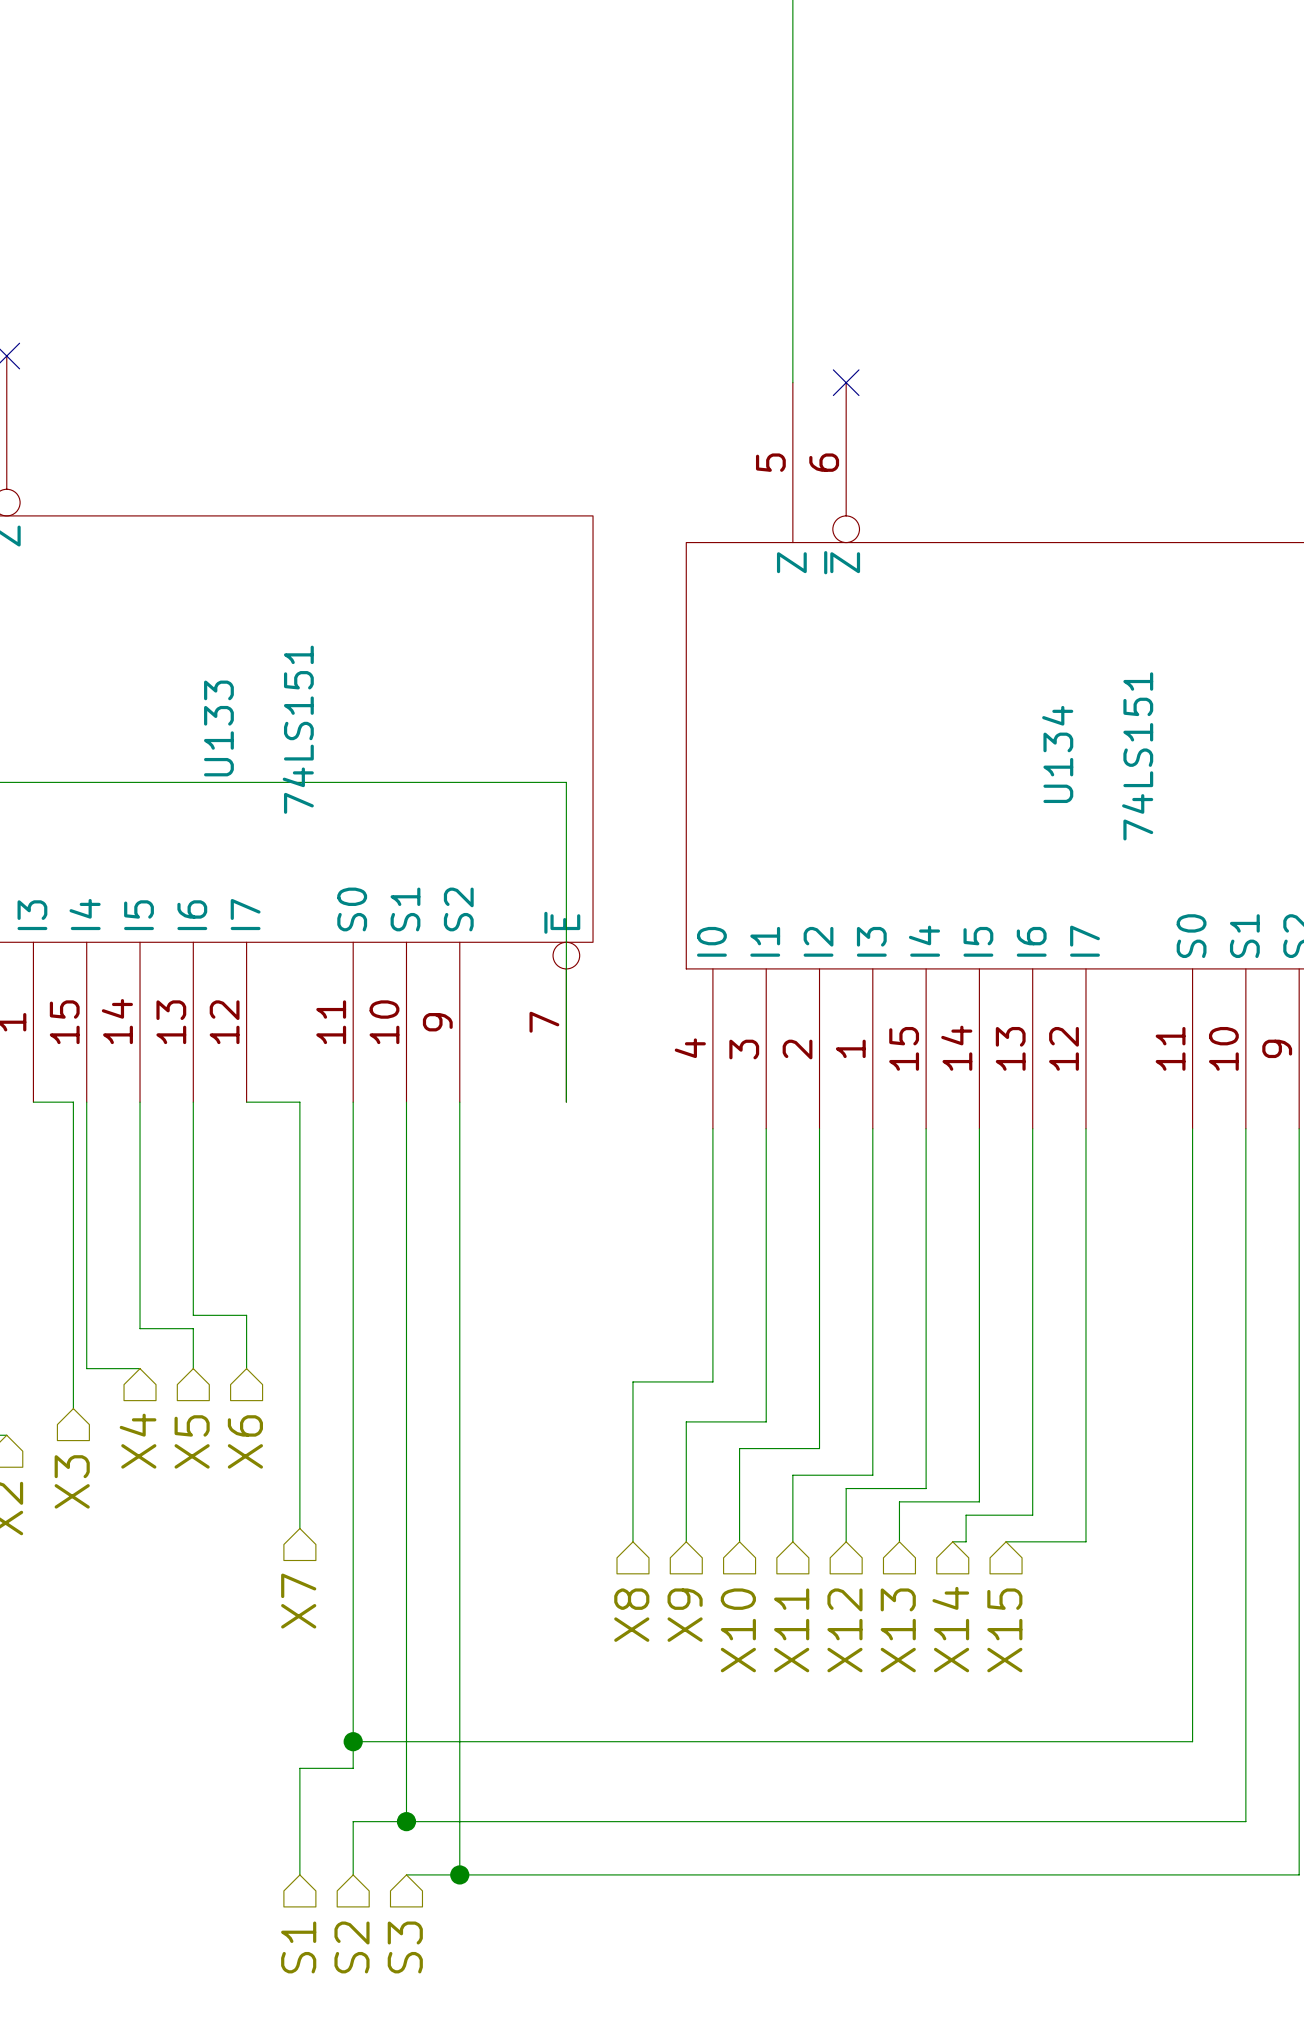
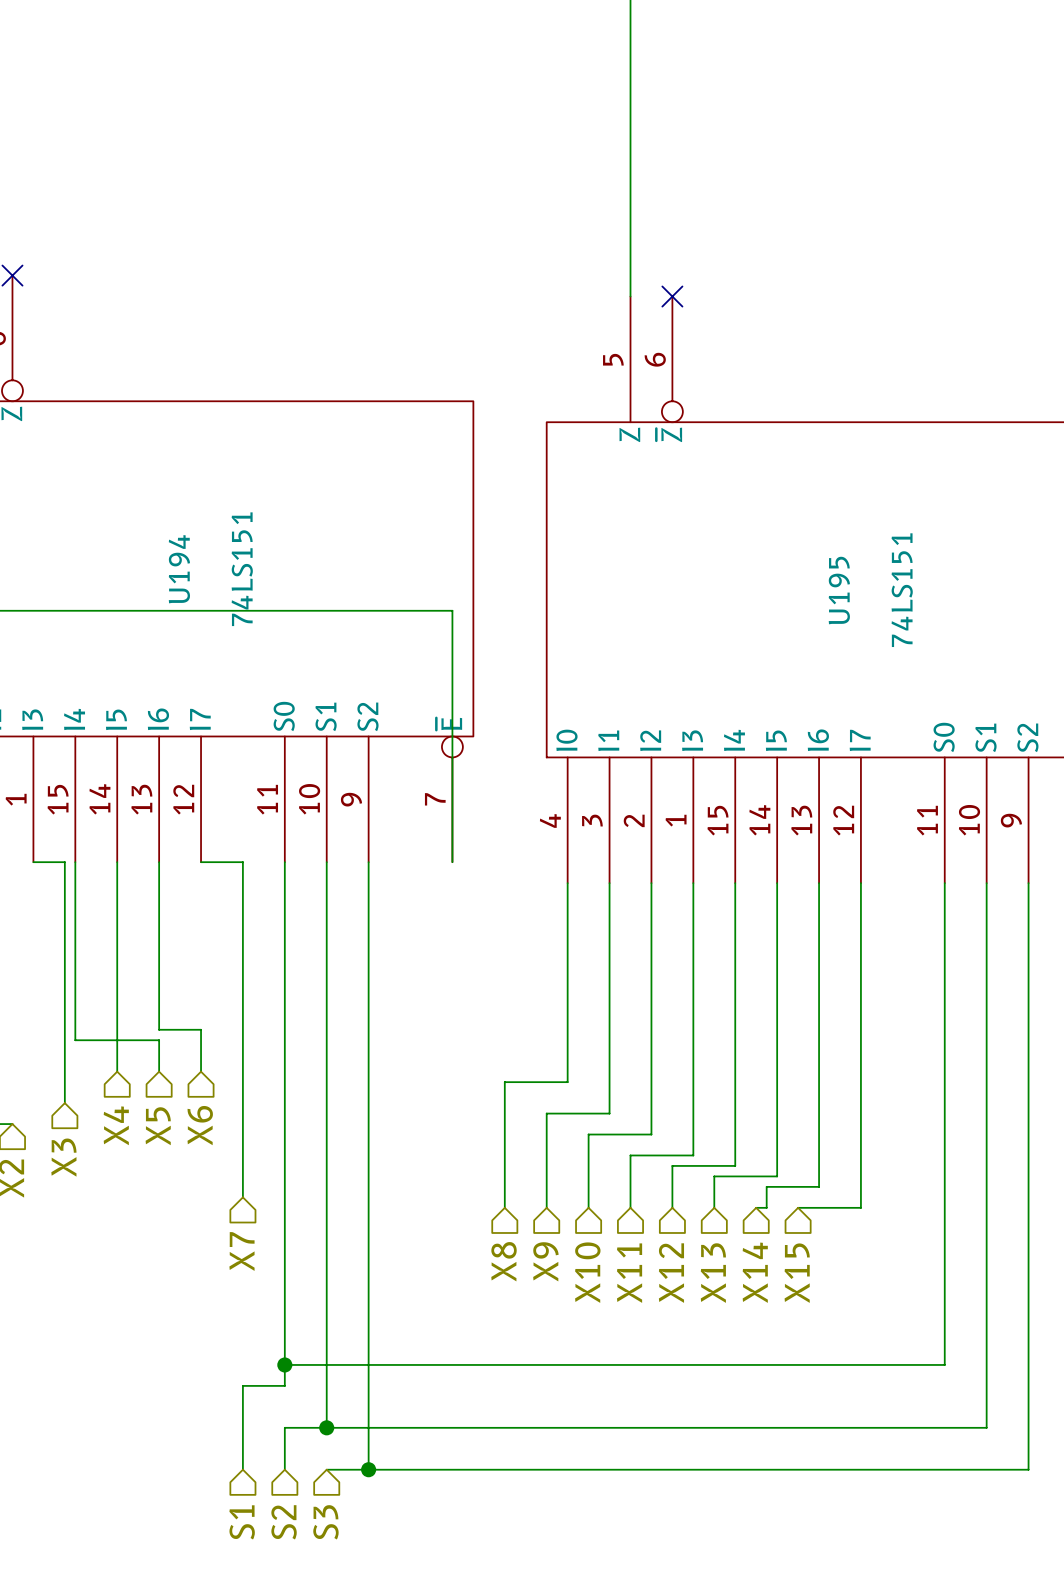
U133 name: U133 (218, 728) -> U194 (179, 569)
U134 name: U134 (1057, 754) -> U195 (839, 590)
wire: (86, 1328) (86, 1368) (140, 1368) -> (75, 1040) (117, 1040) (117, 1071)

